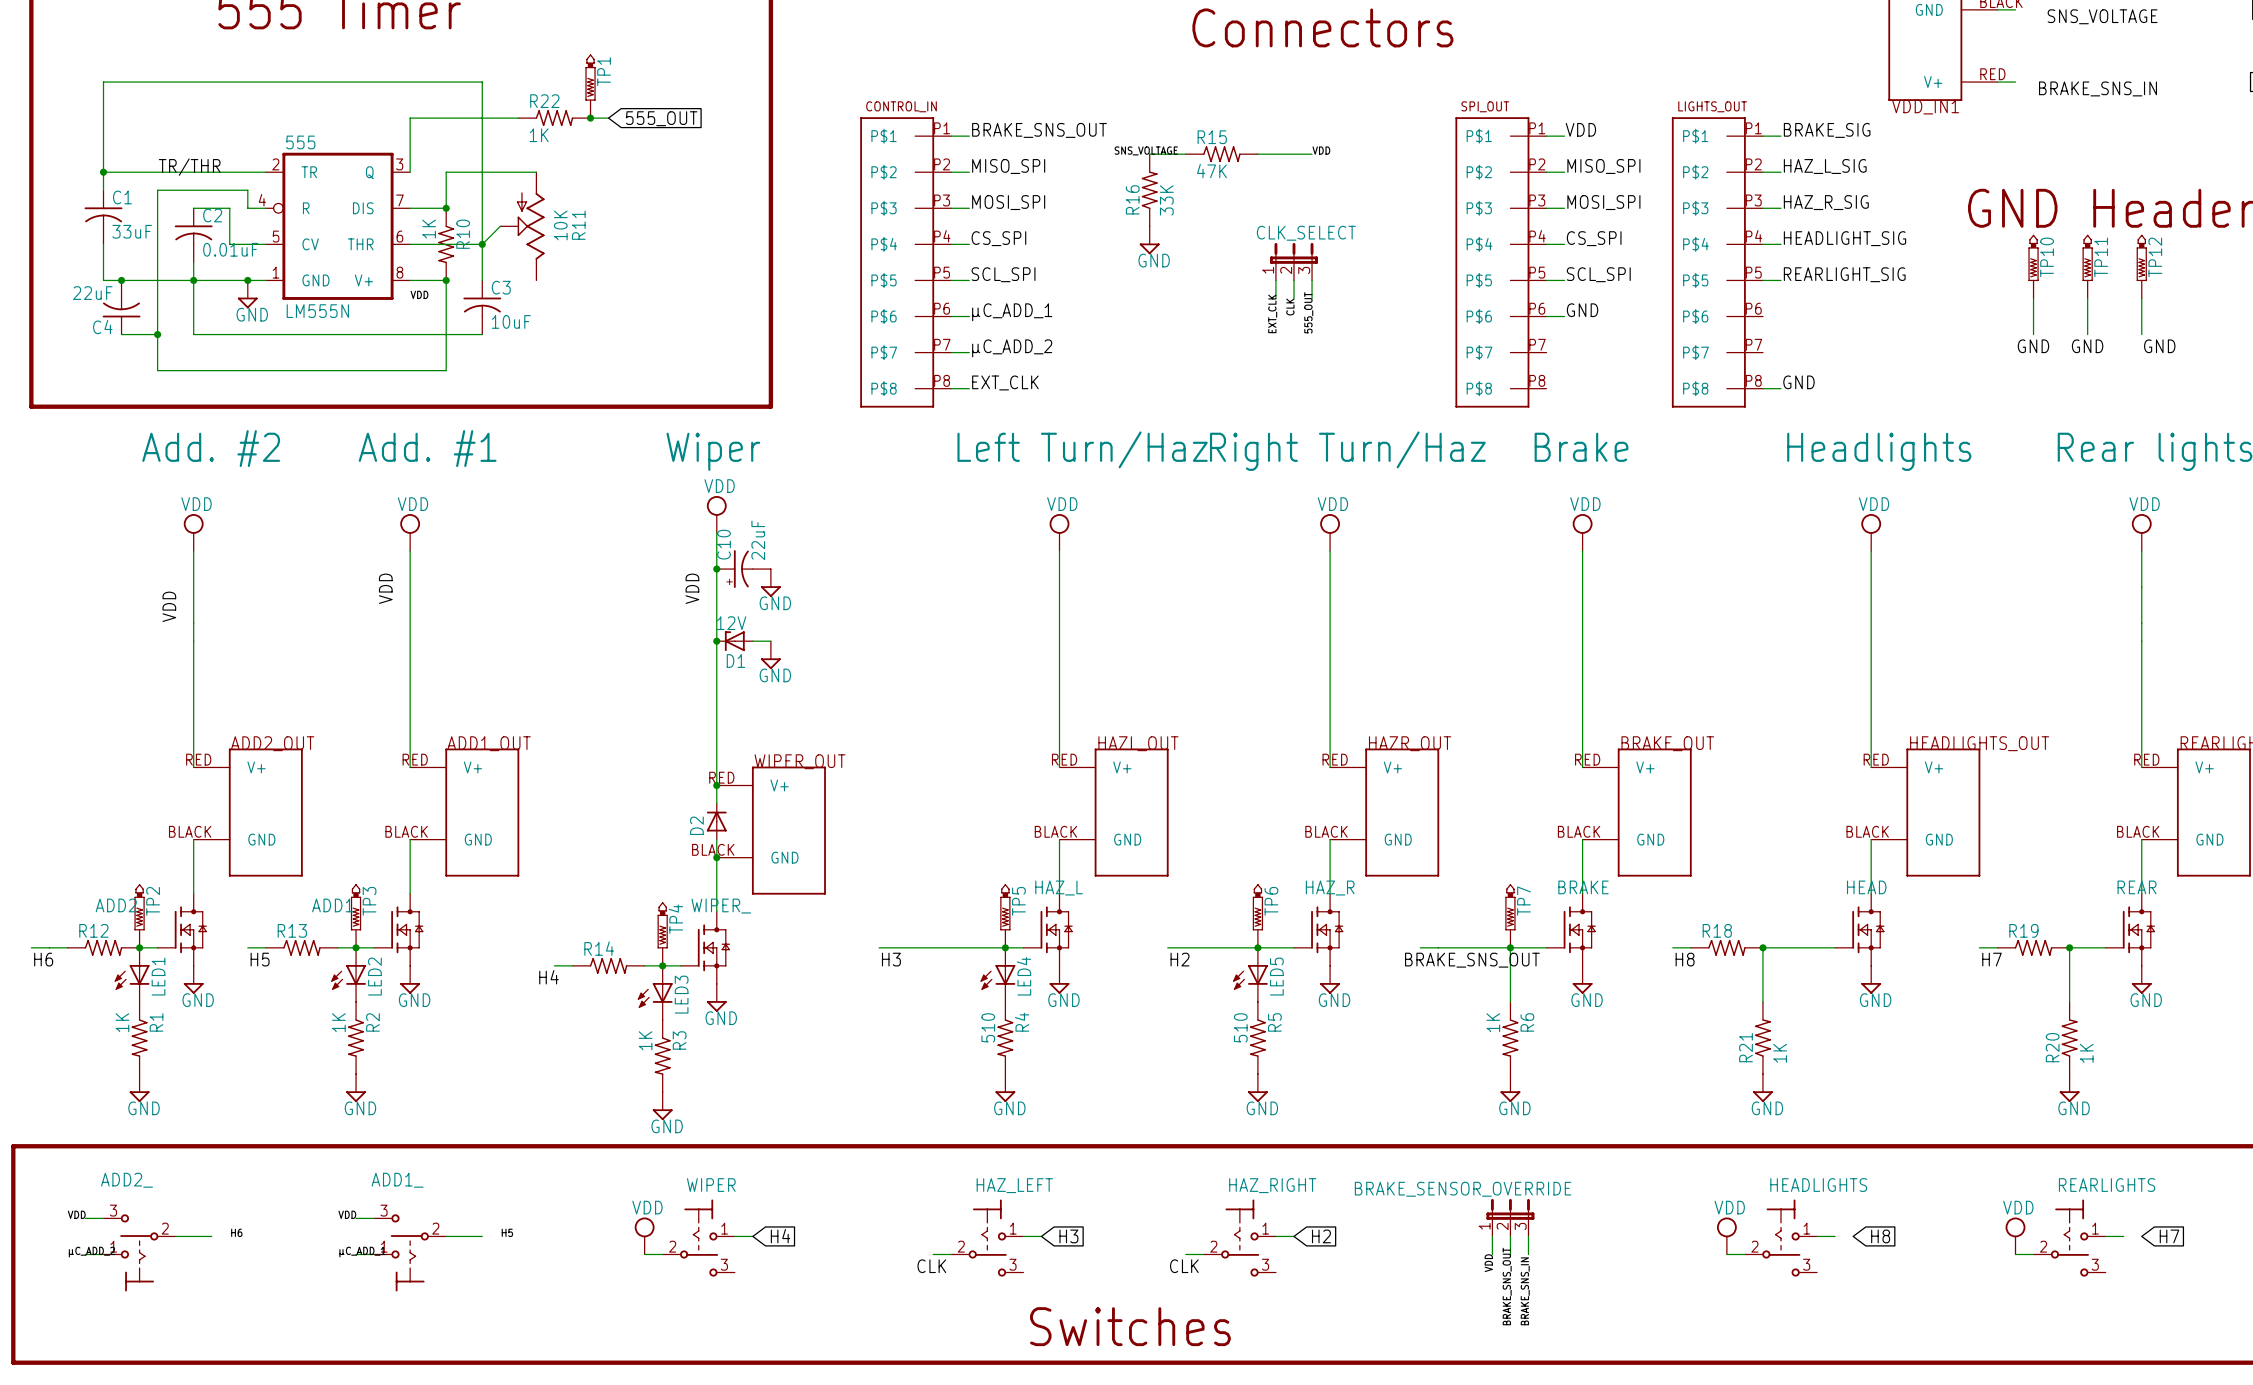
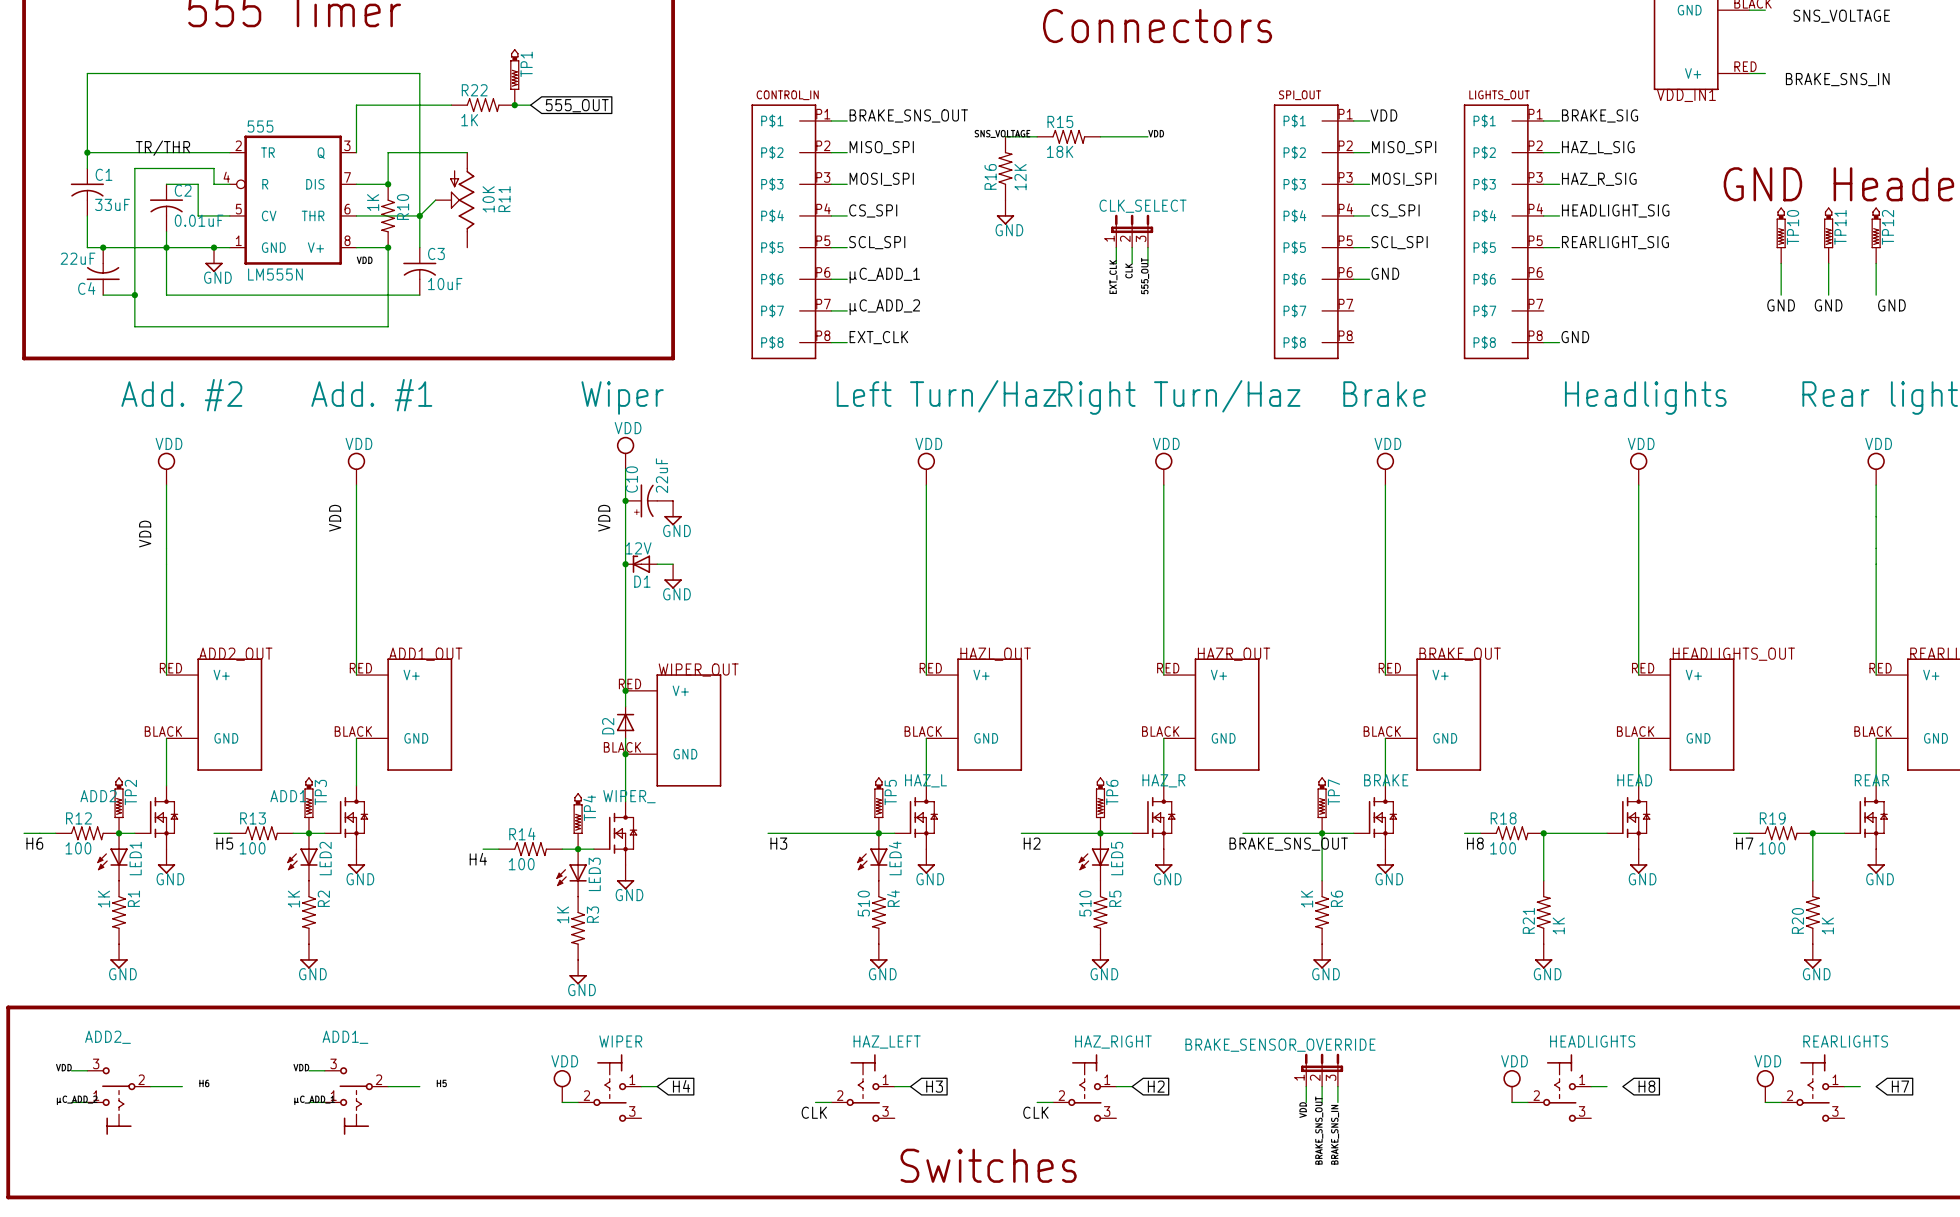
R15 value: 47K (1211, 171) -> 18K (1060, 151)
R16 value: 33K (1166, 200) -> 12K (1020, 177)
R12 value: none -> 100 (78, 848)
R13 value: none -> 100 (252, 848)
R18 value: none -> 100 (1503, 848)
R19 value: none -> 100 (1772, 848)
R14 value: none -> 100 (521, 864)

